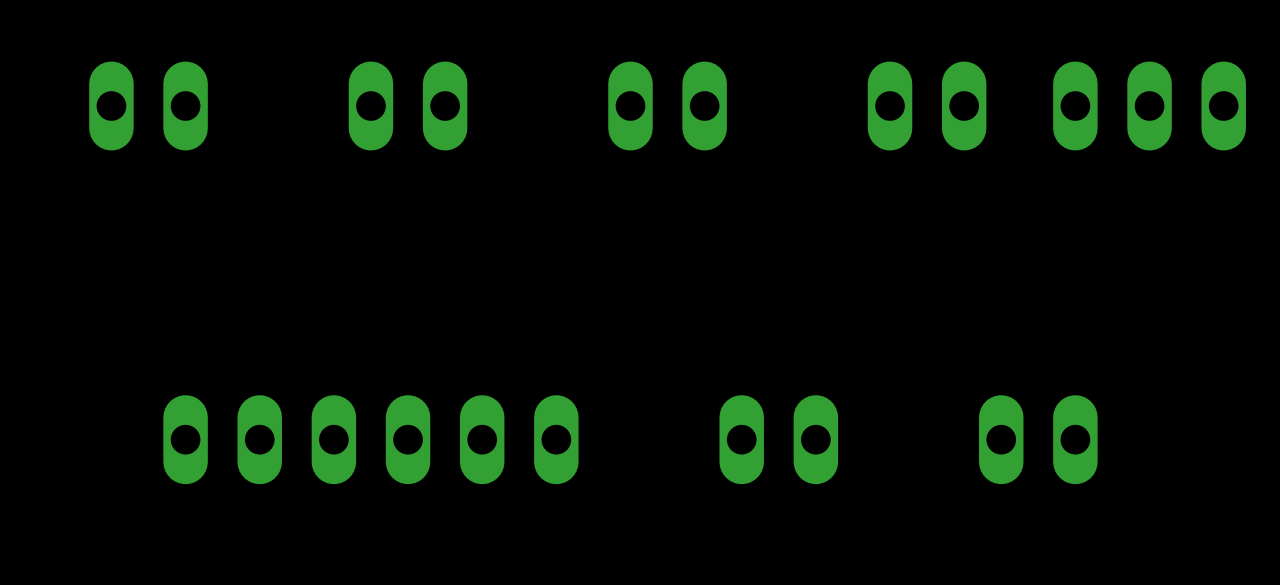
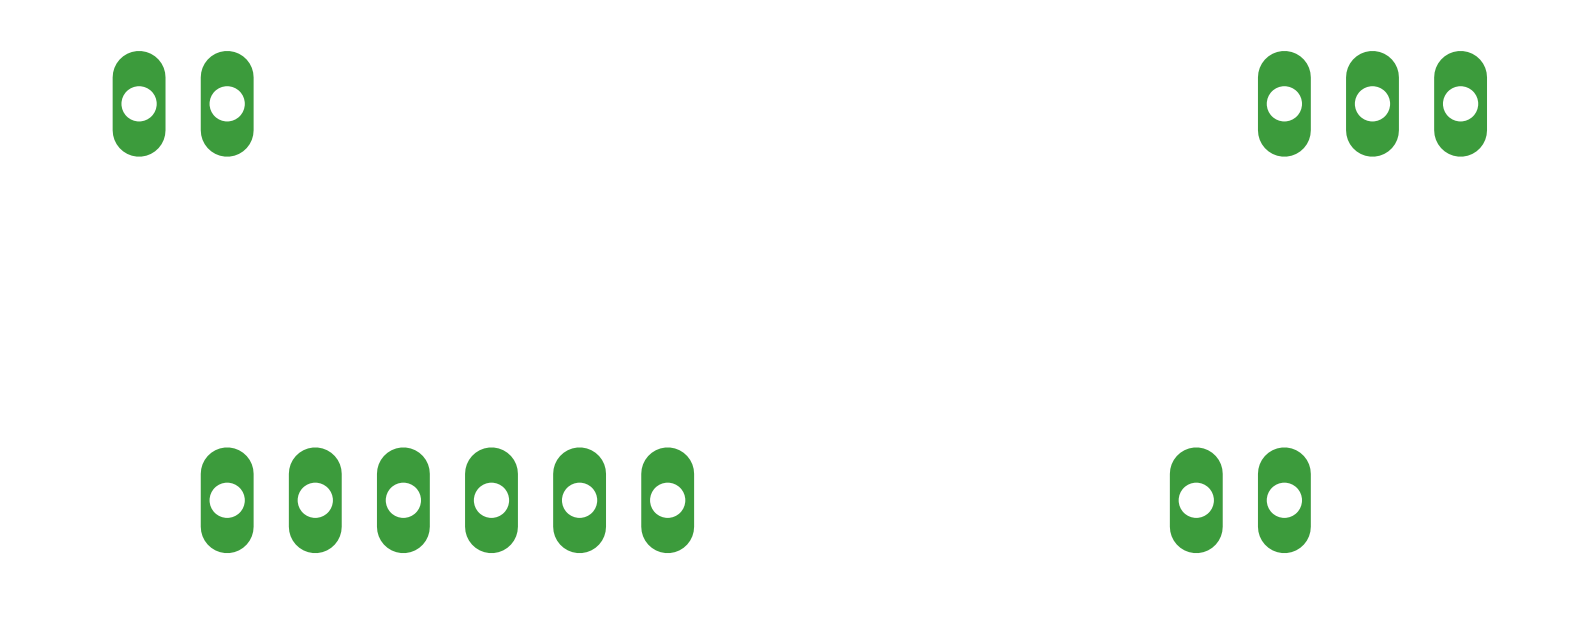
part: (408, 106) -> none
part: (667, 106) -> none
part: (927, 106) -> none
part: (778, 439) -> none

